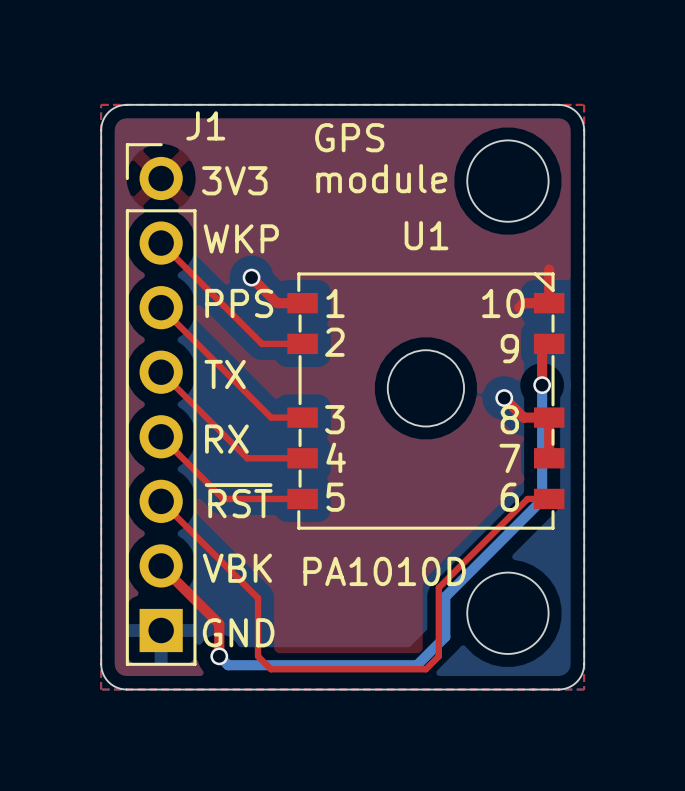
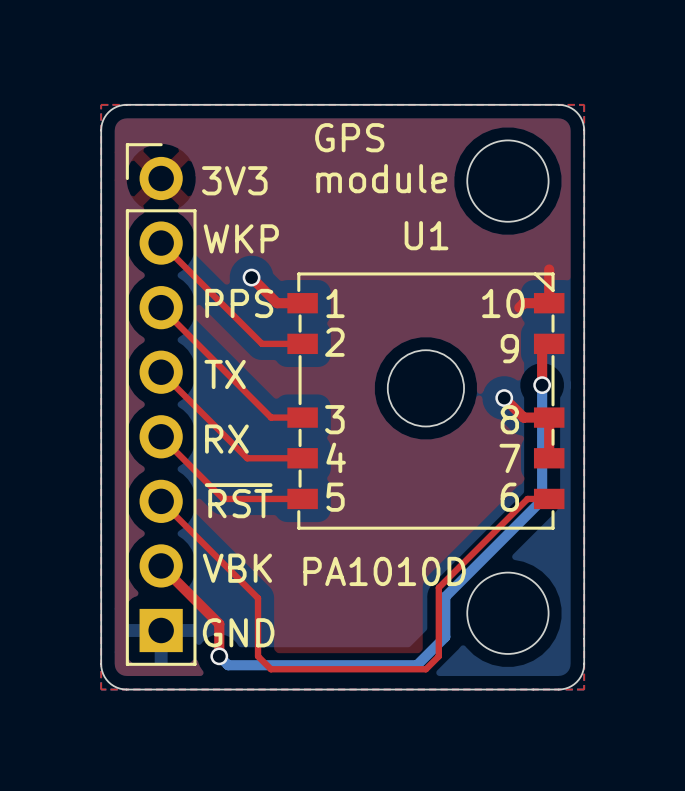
J1 name: J1 (205, 125) -> none

